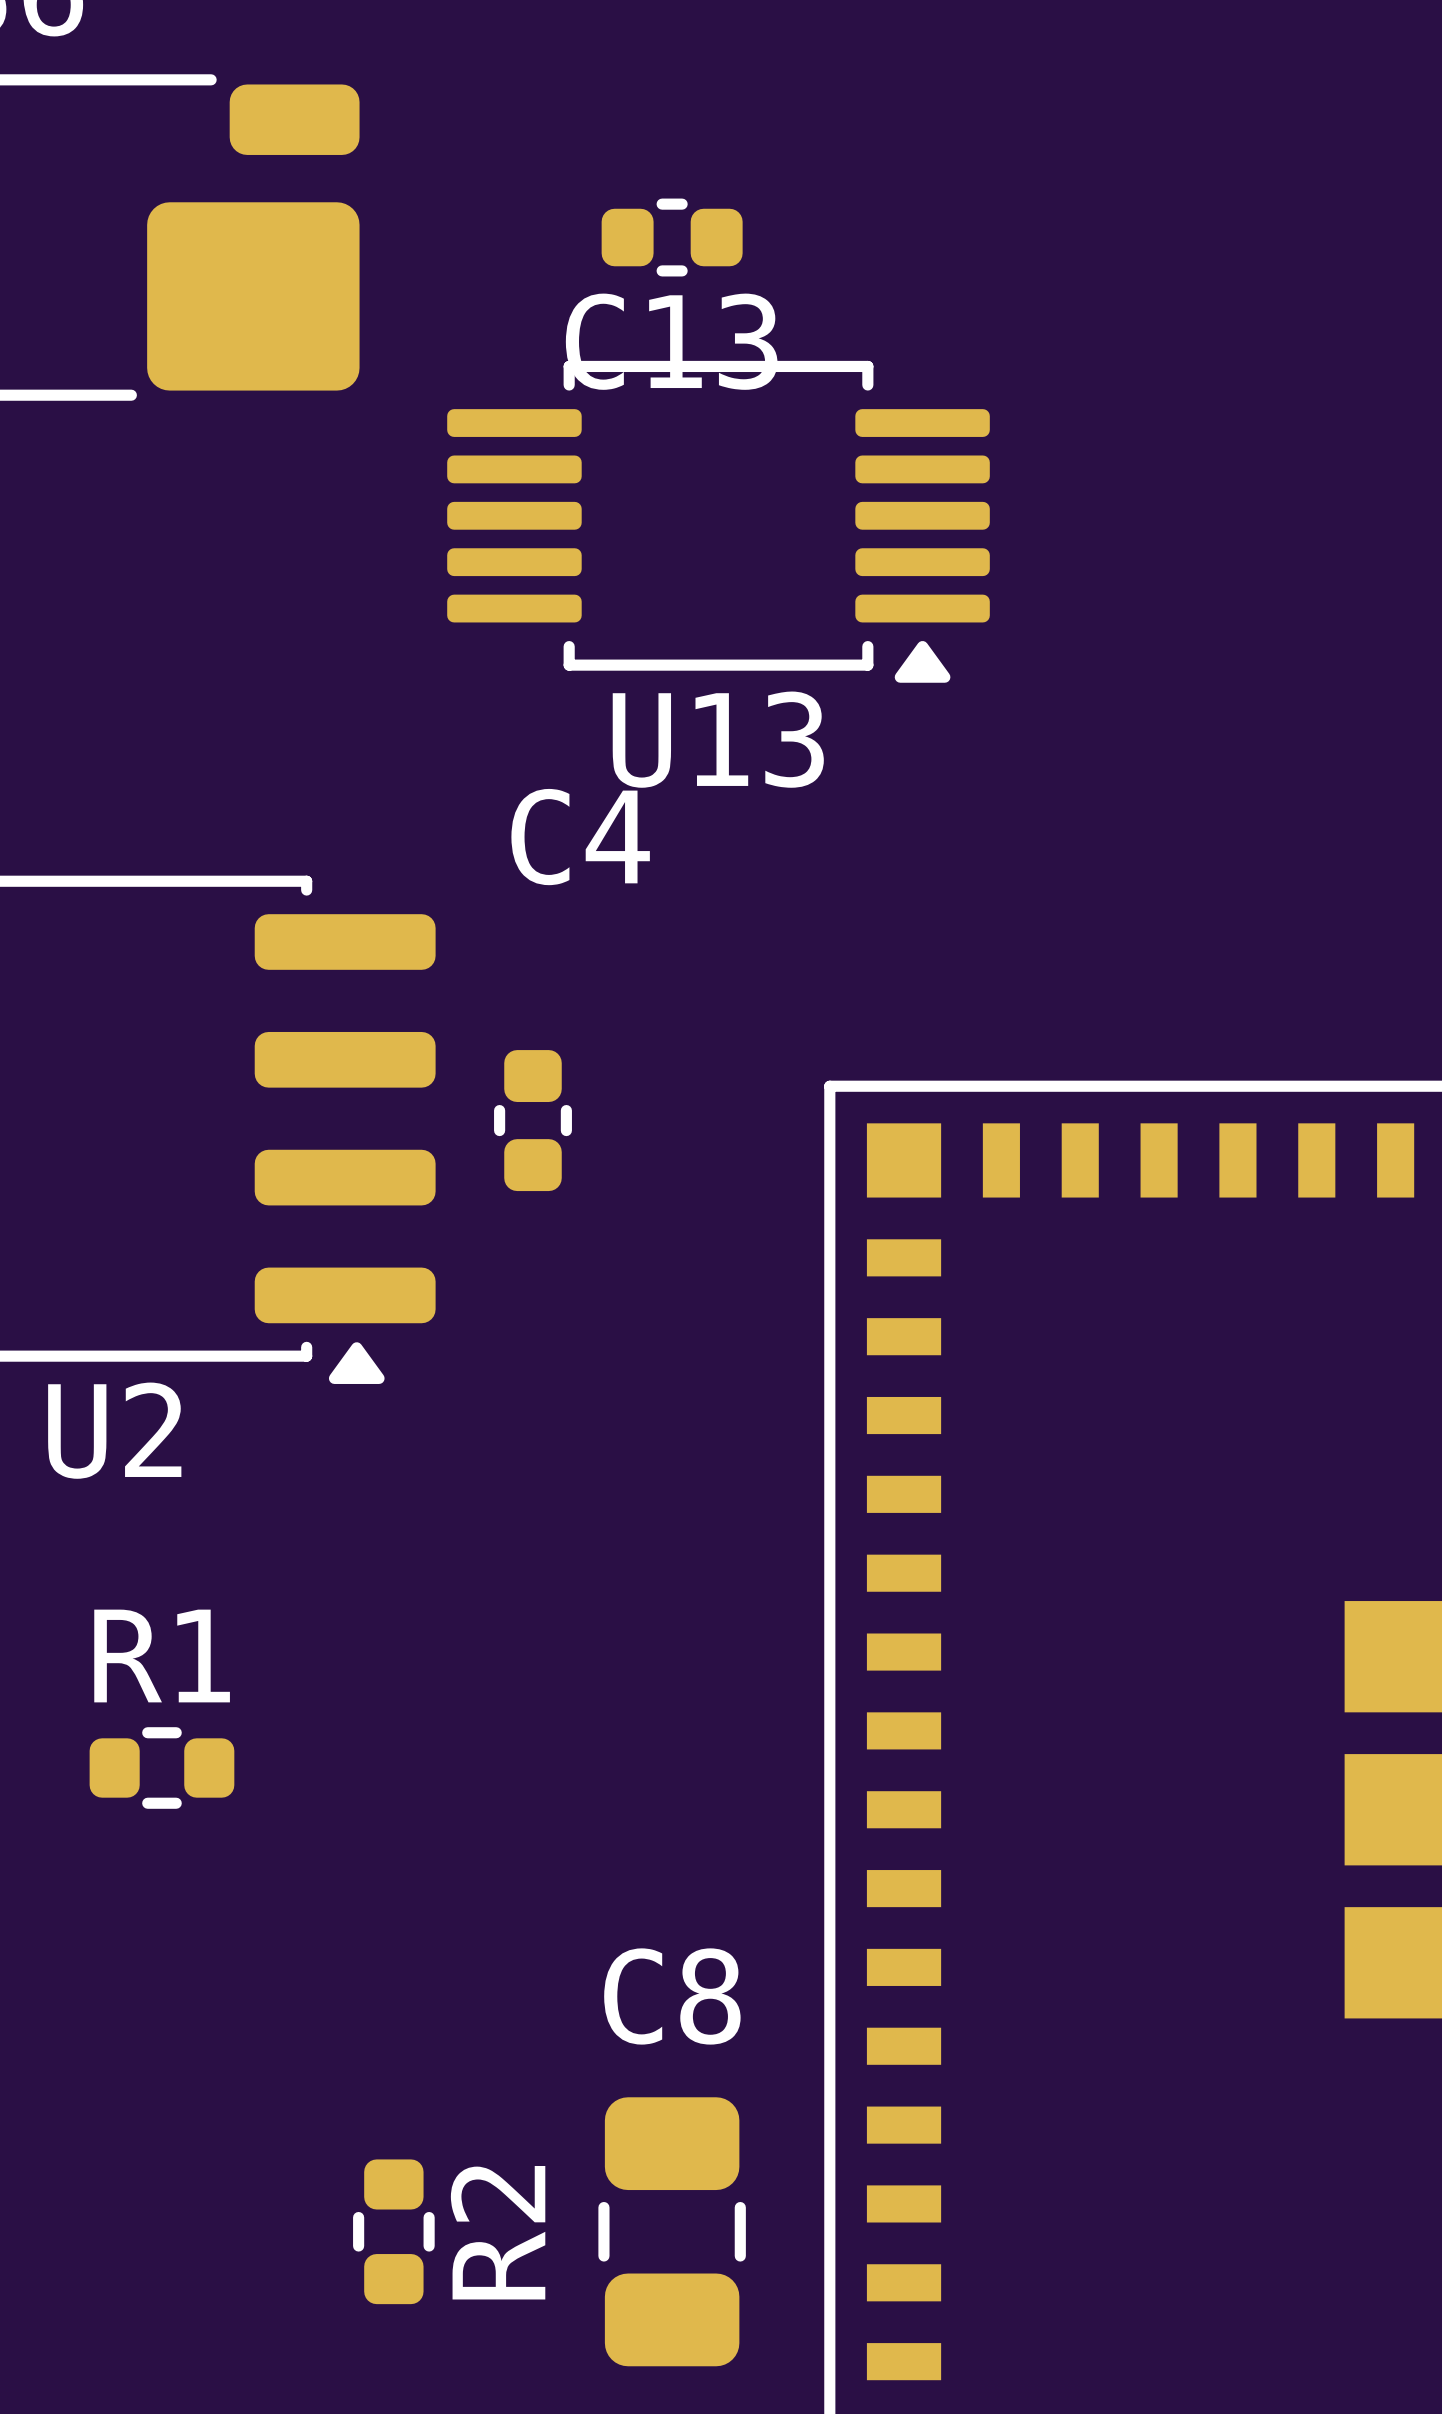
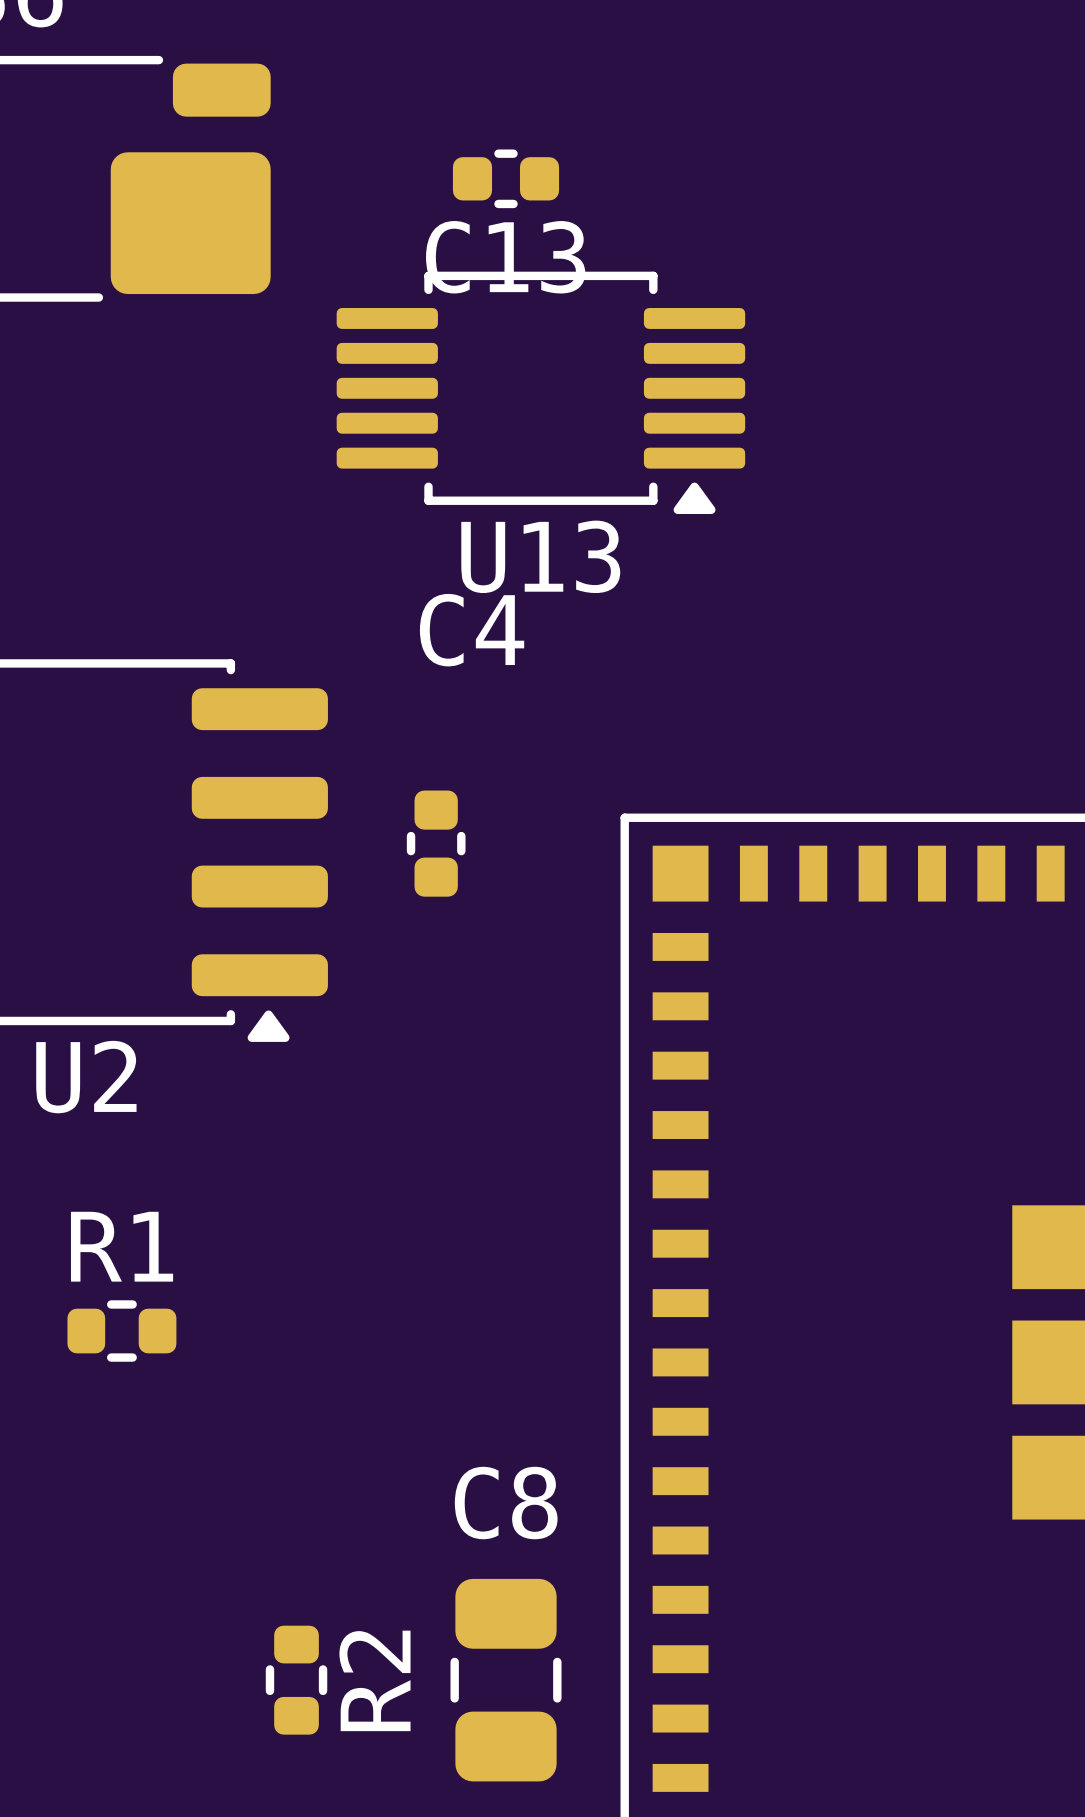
C4 position: (533, 1120) -> (436, 843)

